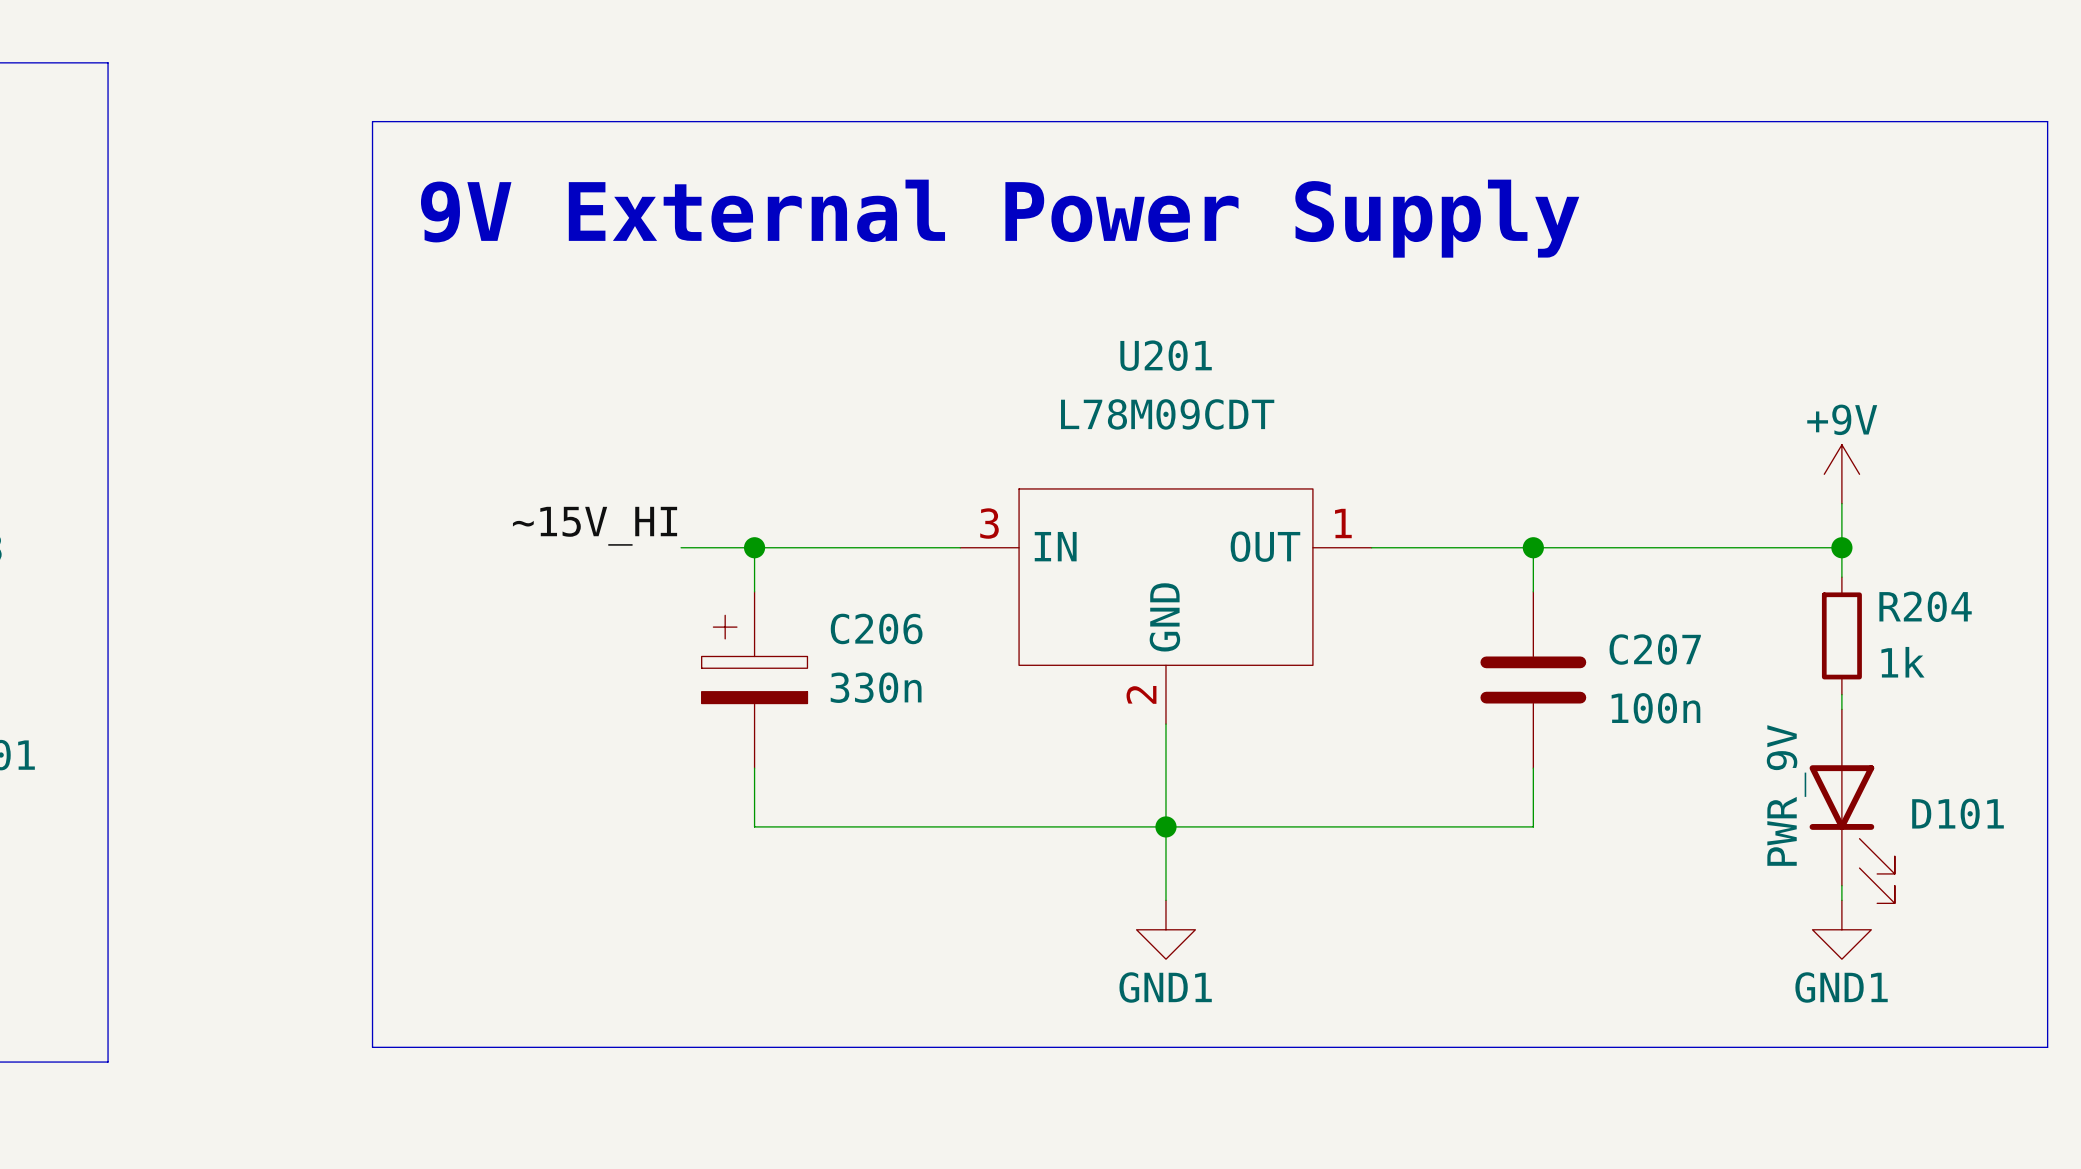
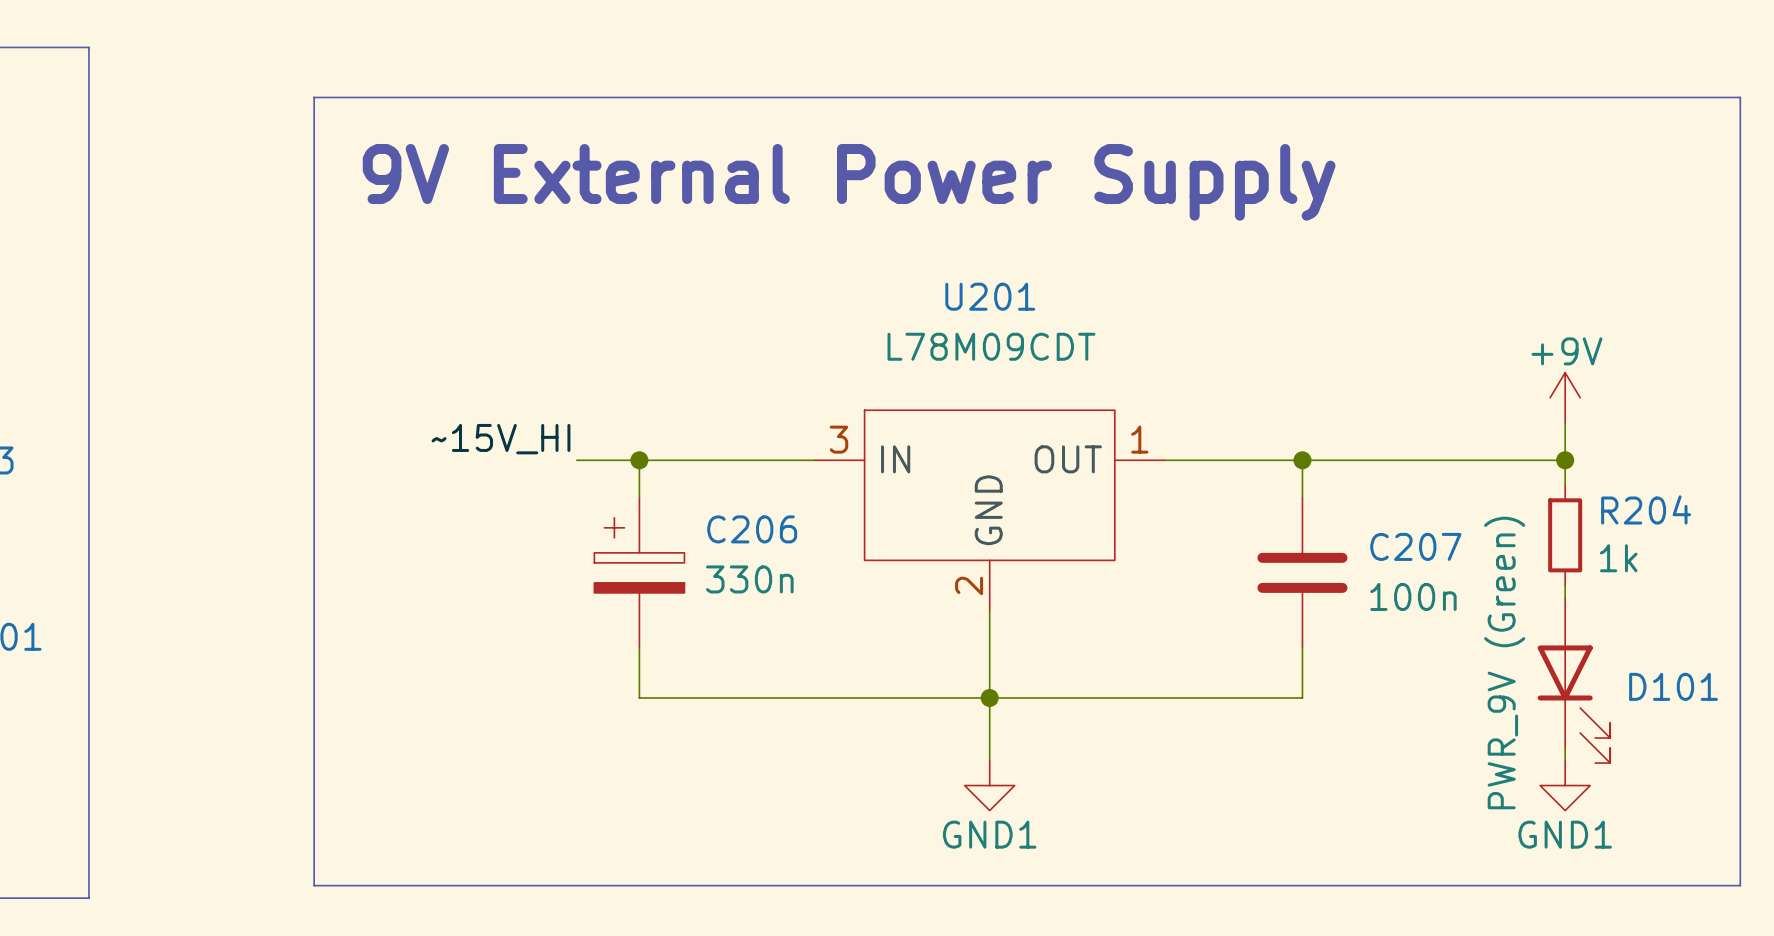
D101 value: PWR_9V (1786, 795) -> PWR_9V (Green) (1504, 663)

